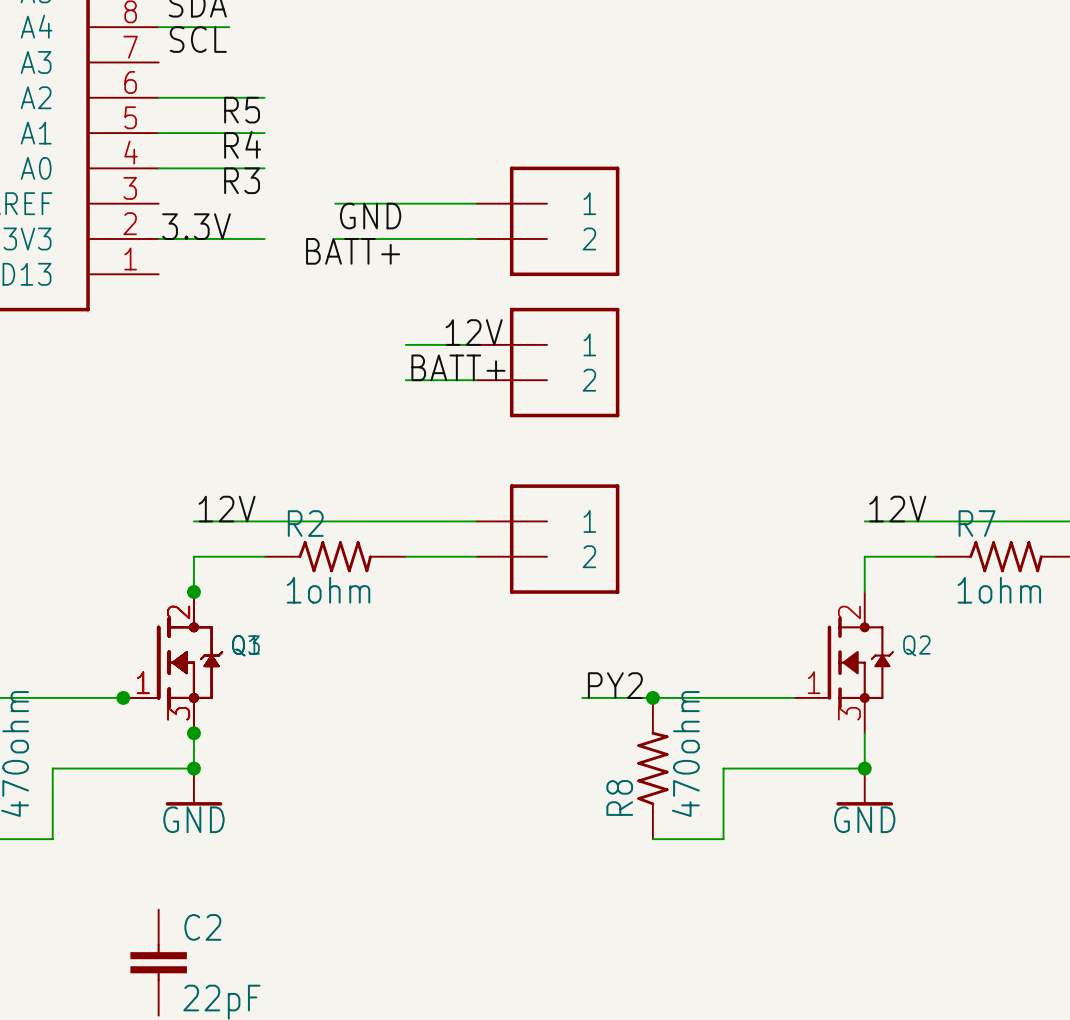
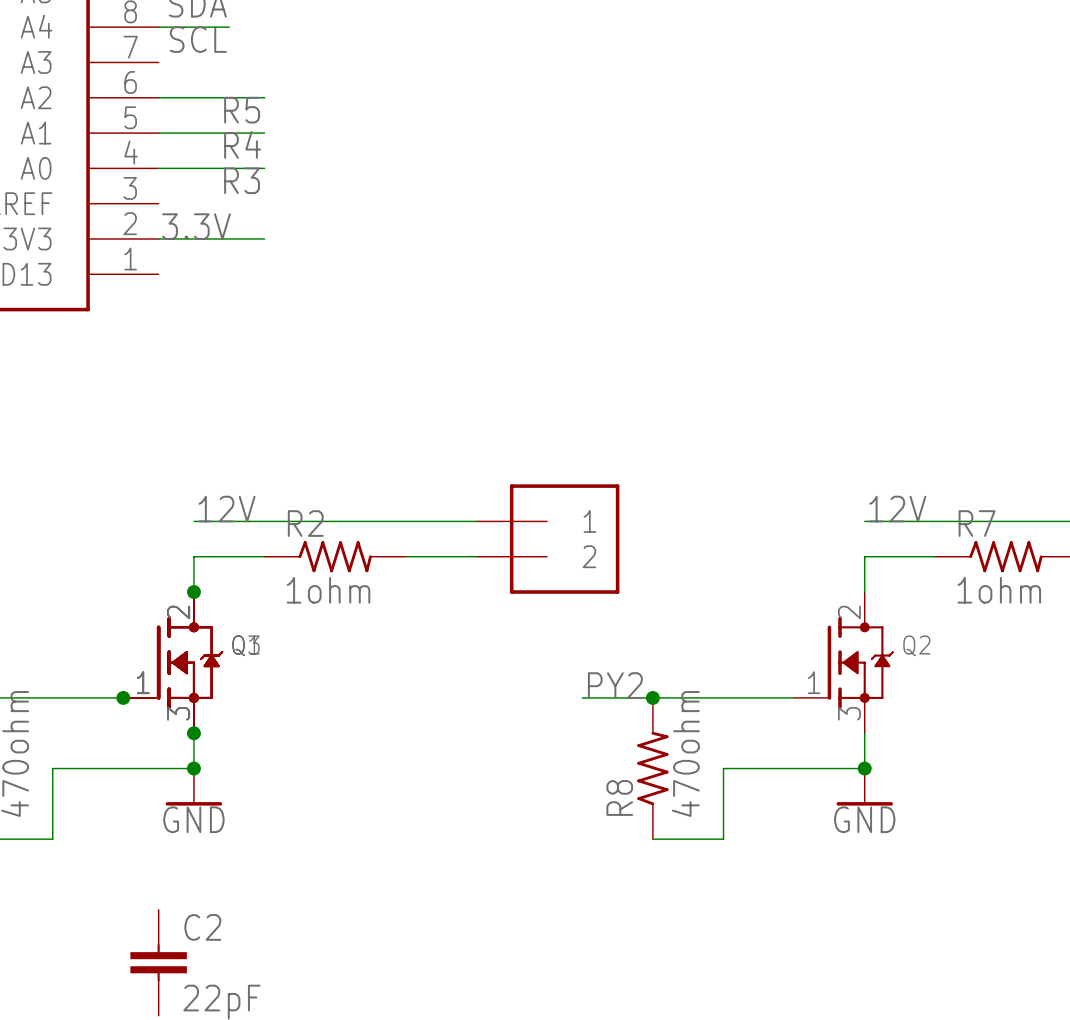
wire: (335, 203) (476, 203) -> none
label: GND (370, 216) -> none
part: (547, 221) -> none
wire: (335, 238) (476, 238) -> none
label: BATT+ (353, 251) -> none
label: 12V (474, 332) -> none
wire: (405, 344) (476, 344) -> none
part: (547, 362) -> none
label: BATT+ (458, 367) -> none
wire: (405, 380) (476, 380) -> none

